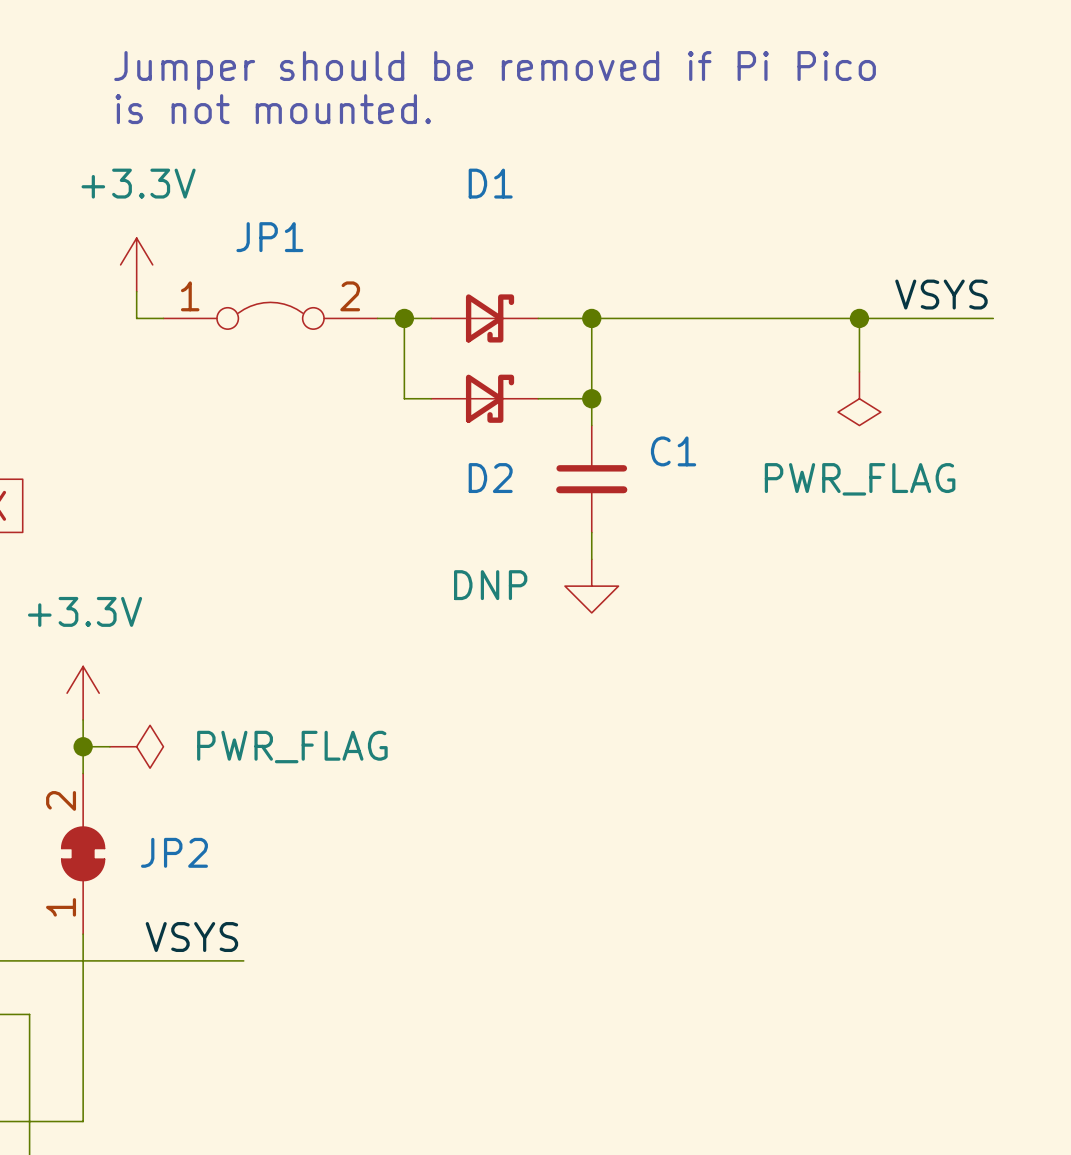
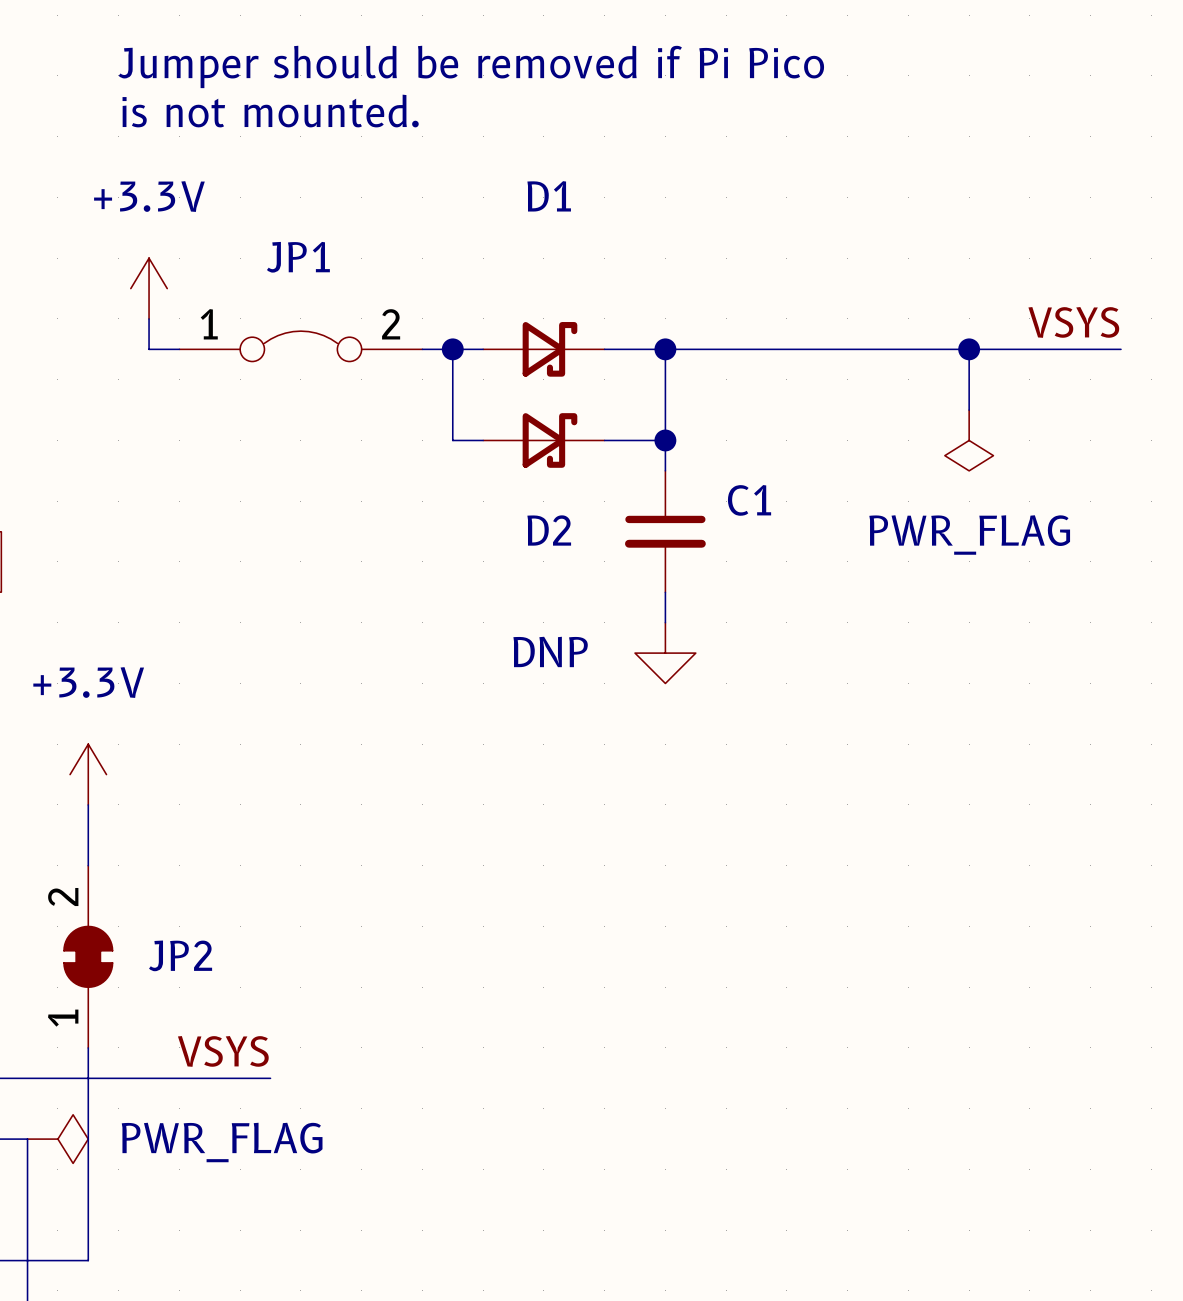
wire: (83, 746) (109, 746) -> none
junction: (83, 746) -> none
power symbol position: PWR_FLAG (136, 746) -> PWR_FLAG (57, 1139)

